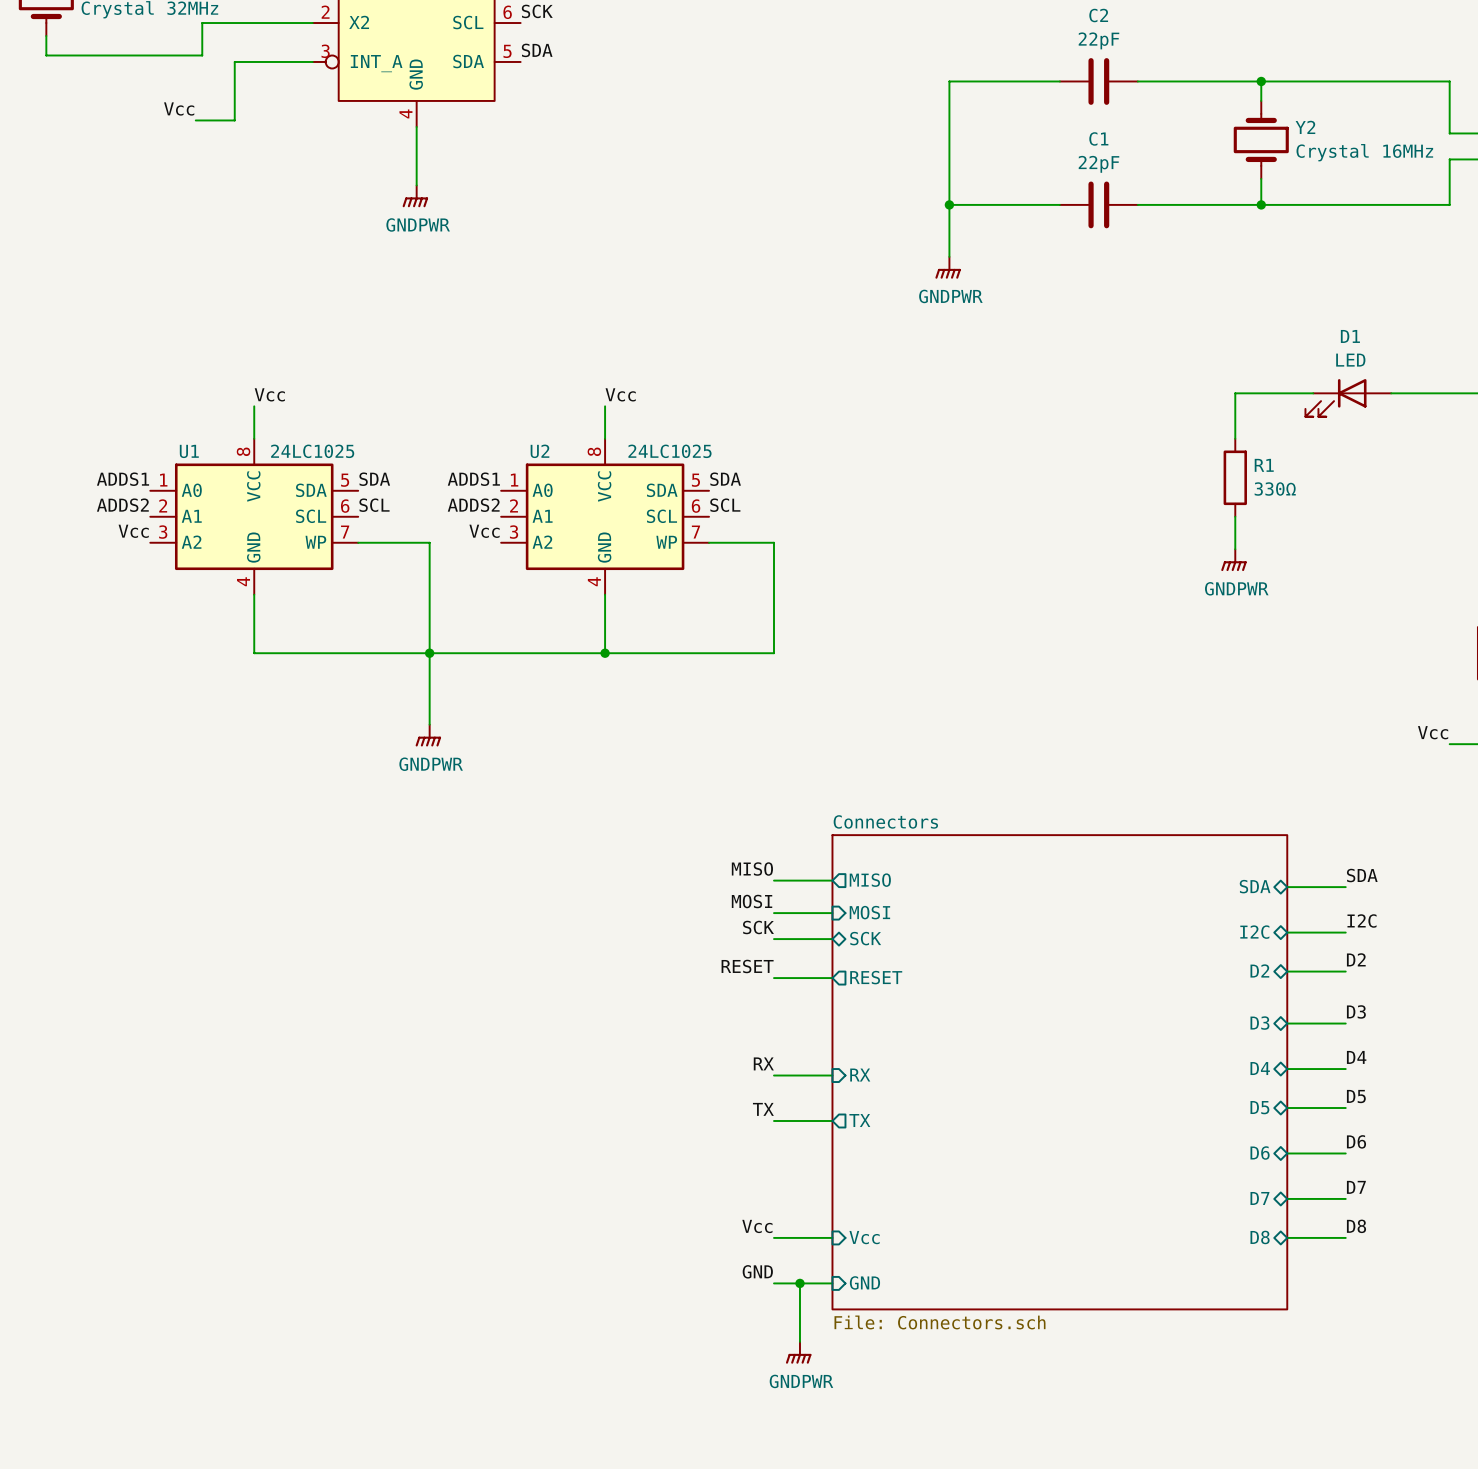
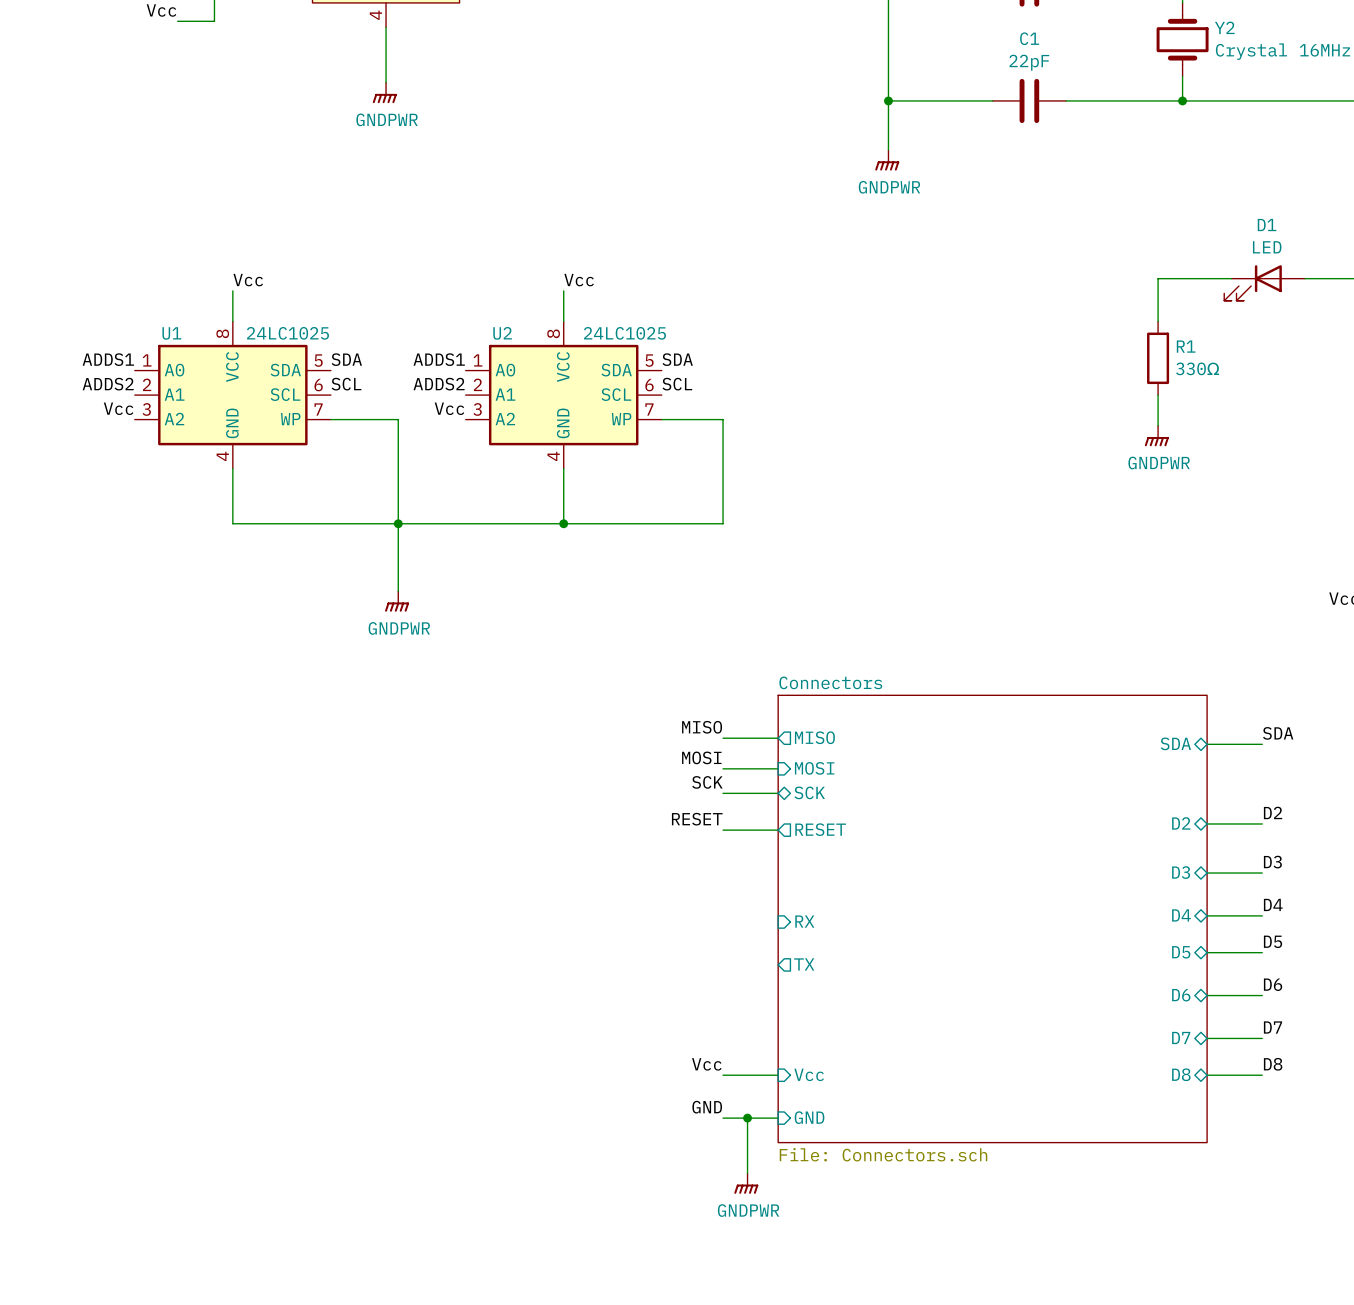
label: I2C (1362, 921) -> none
sheet pin: I2C (1254, 932) -> none
wire: (1287, 932) (1345, 932) -> none
label: RX (763, 1063) -> none
wire: (774, 1075) (832, 1075) -> none
label: TX (763, 1109) -> none
wire: (774, 1120) (832, 1120) -> none

